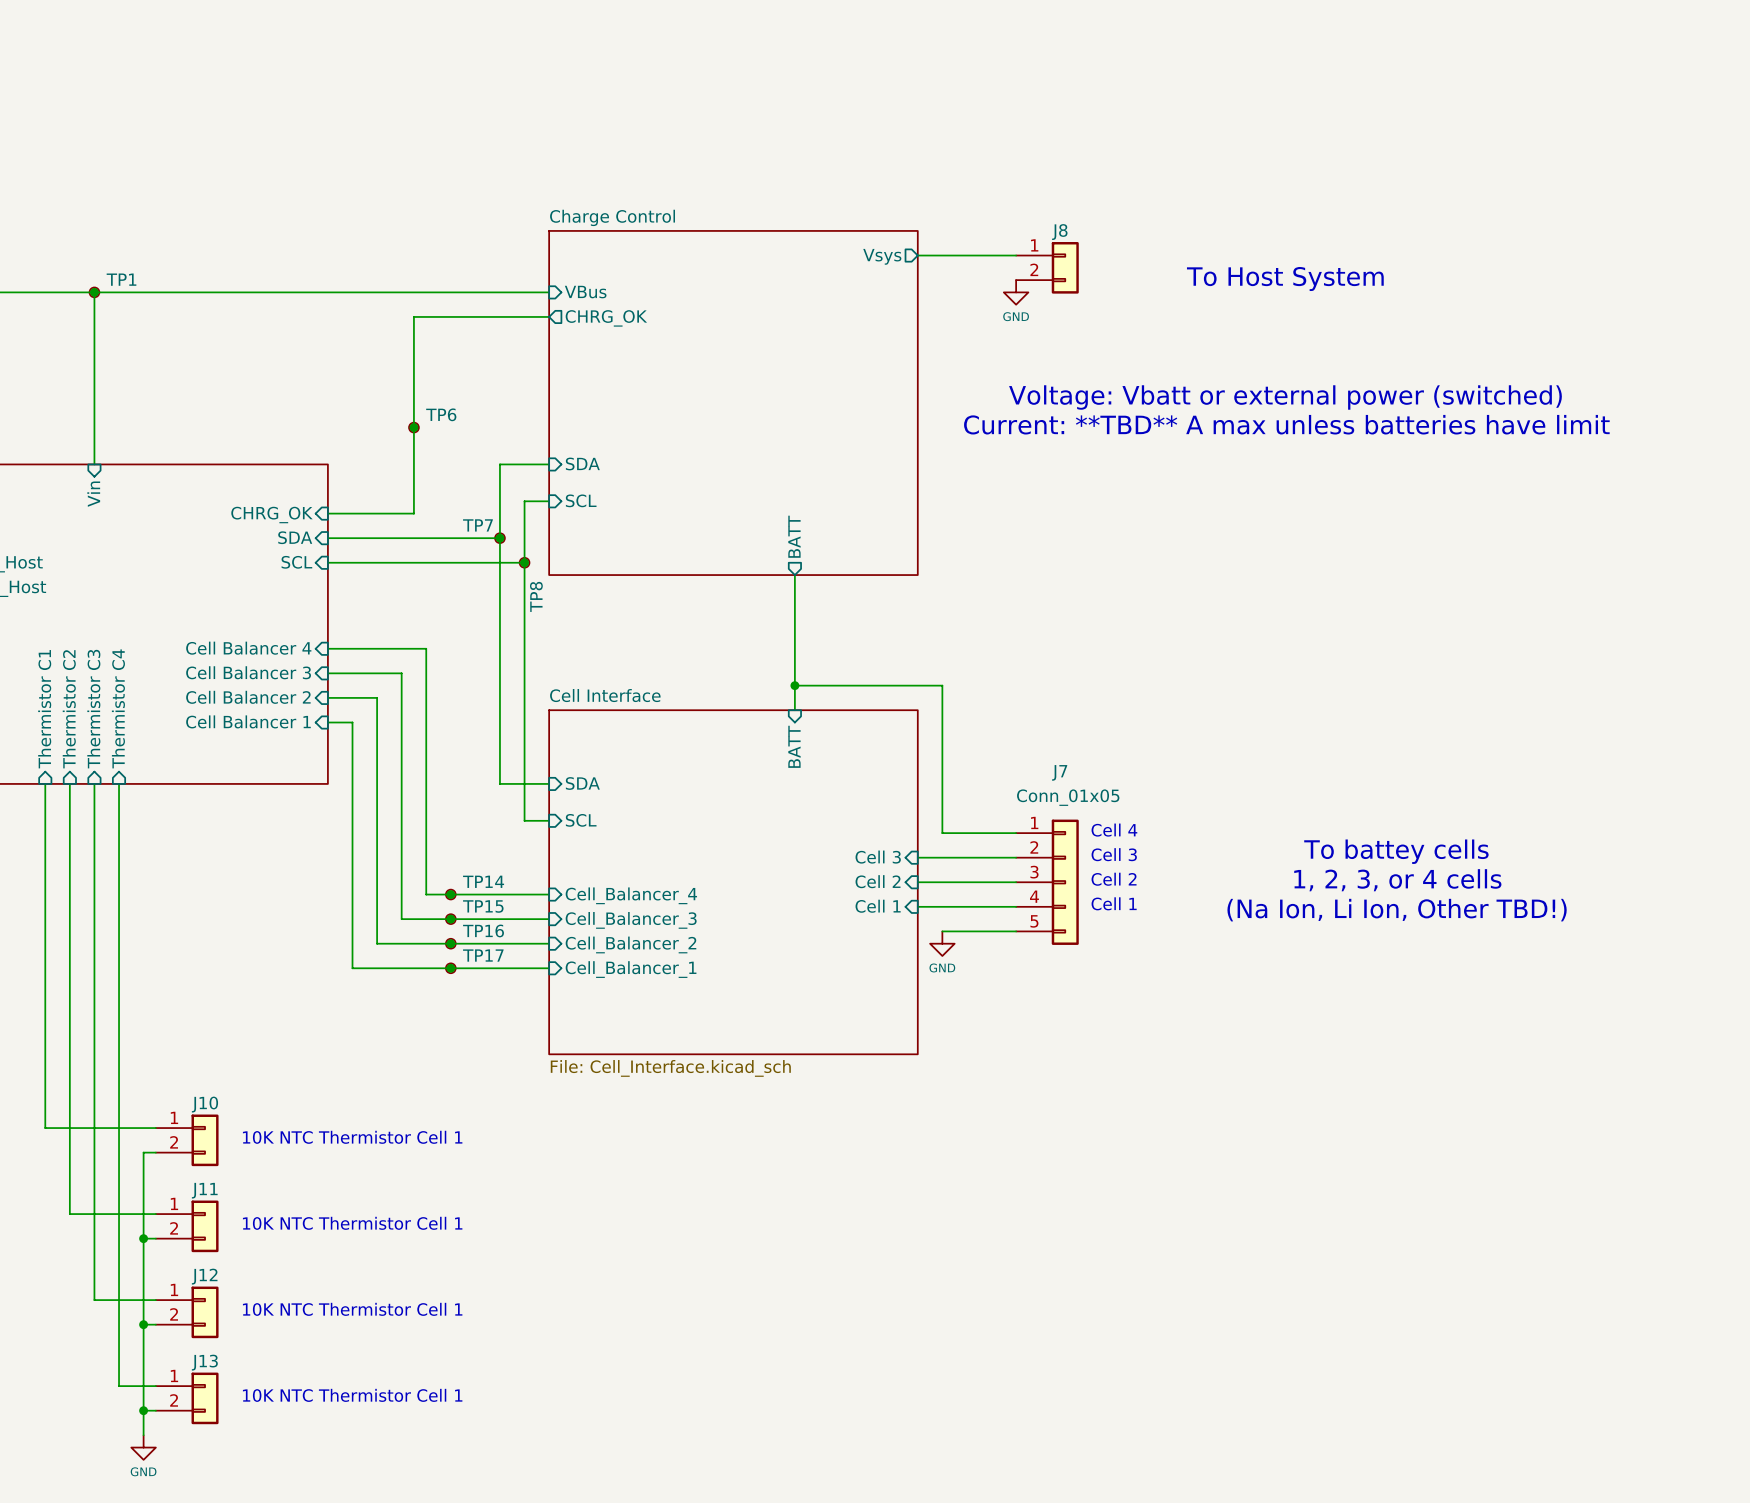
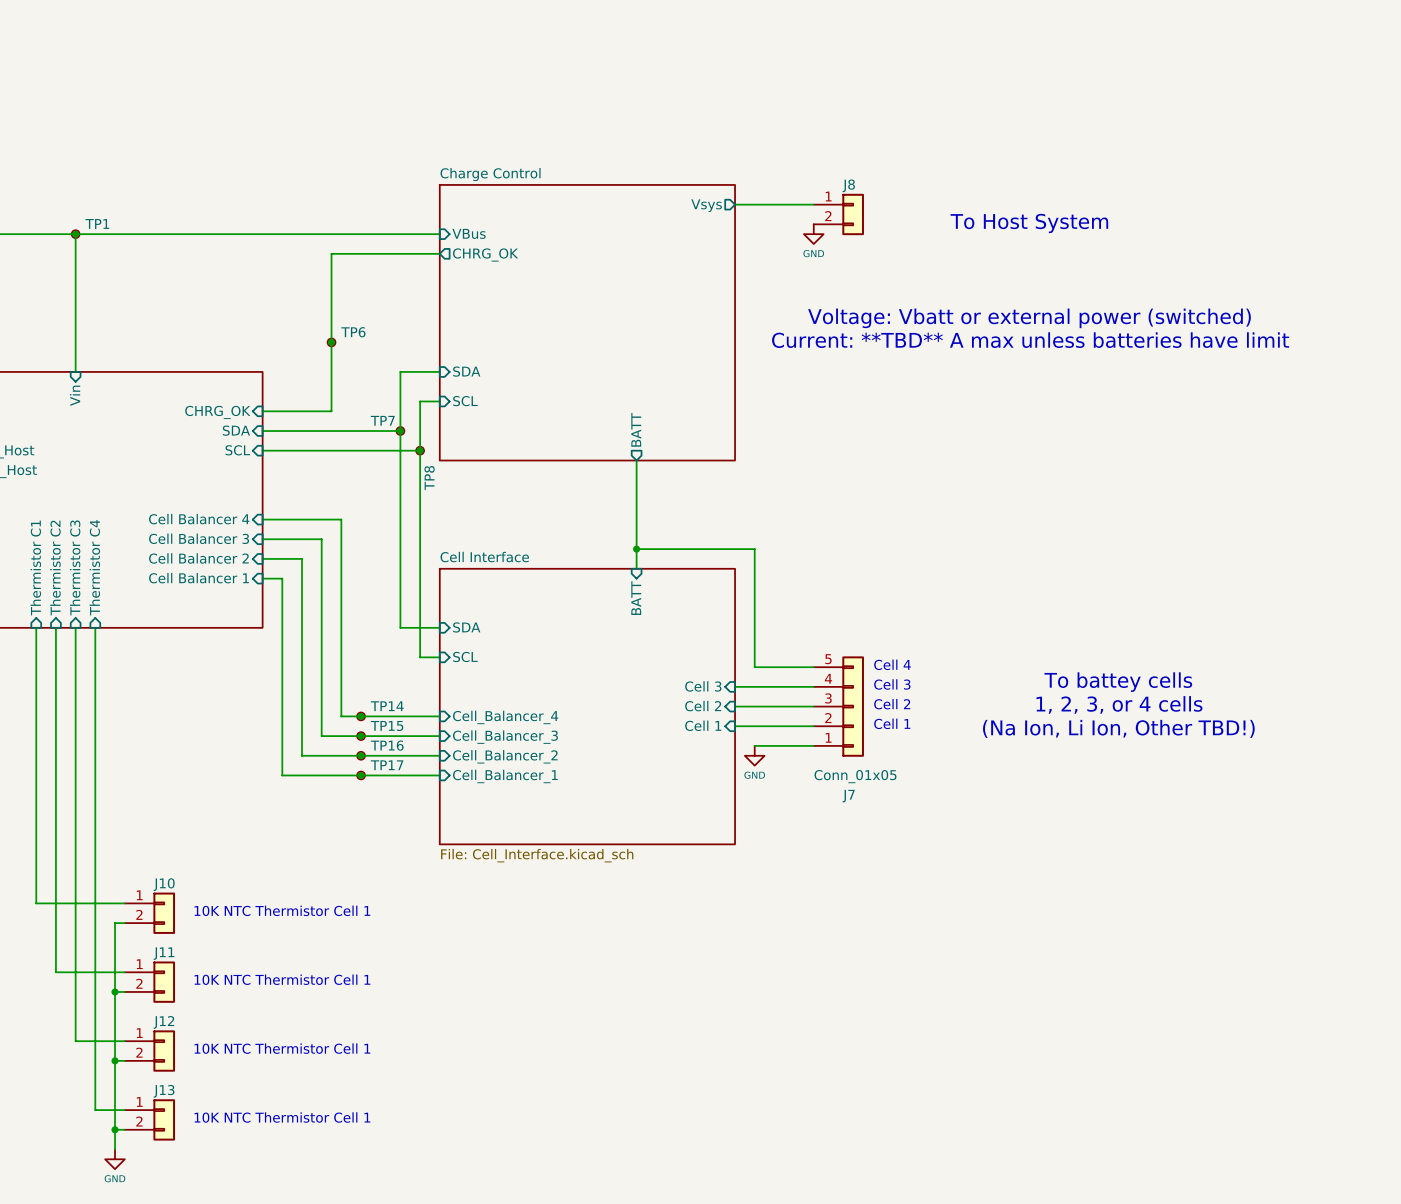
J7 flip: as is (1065, 882) -> up-down (853, 706)

